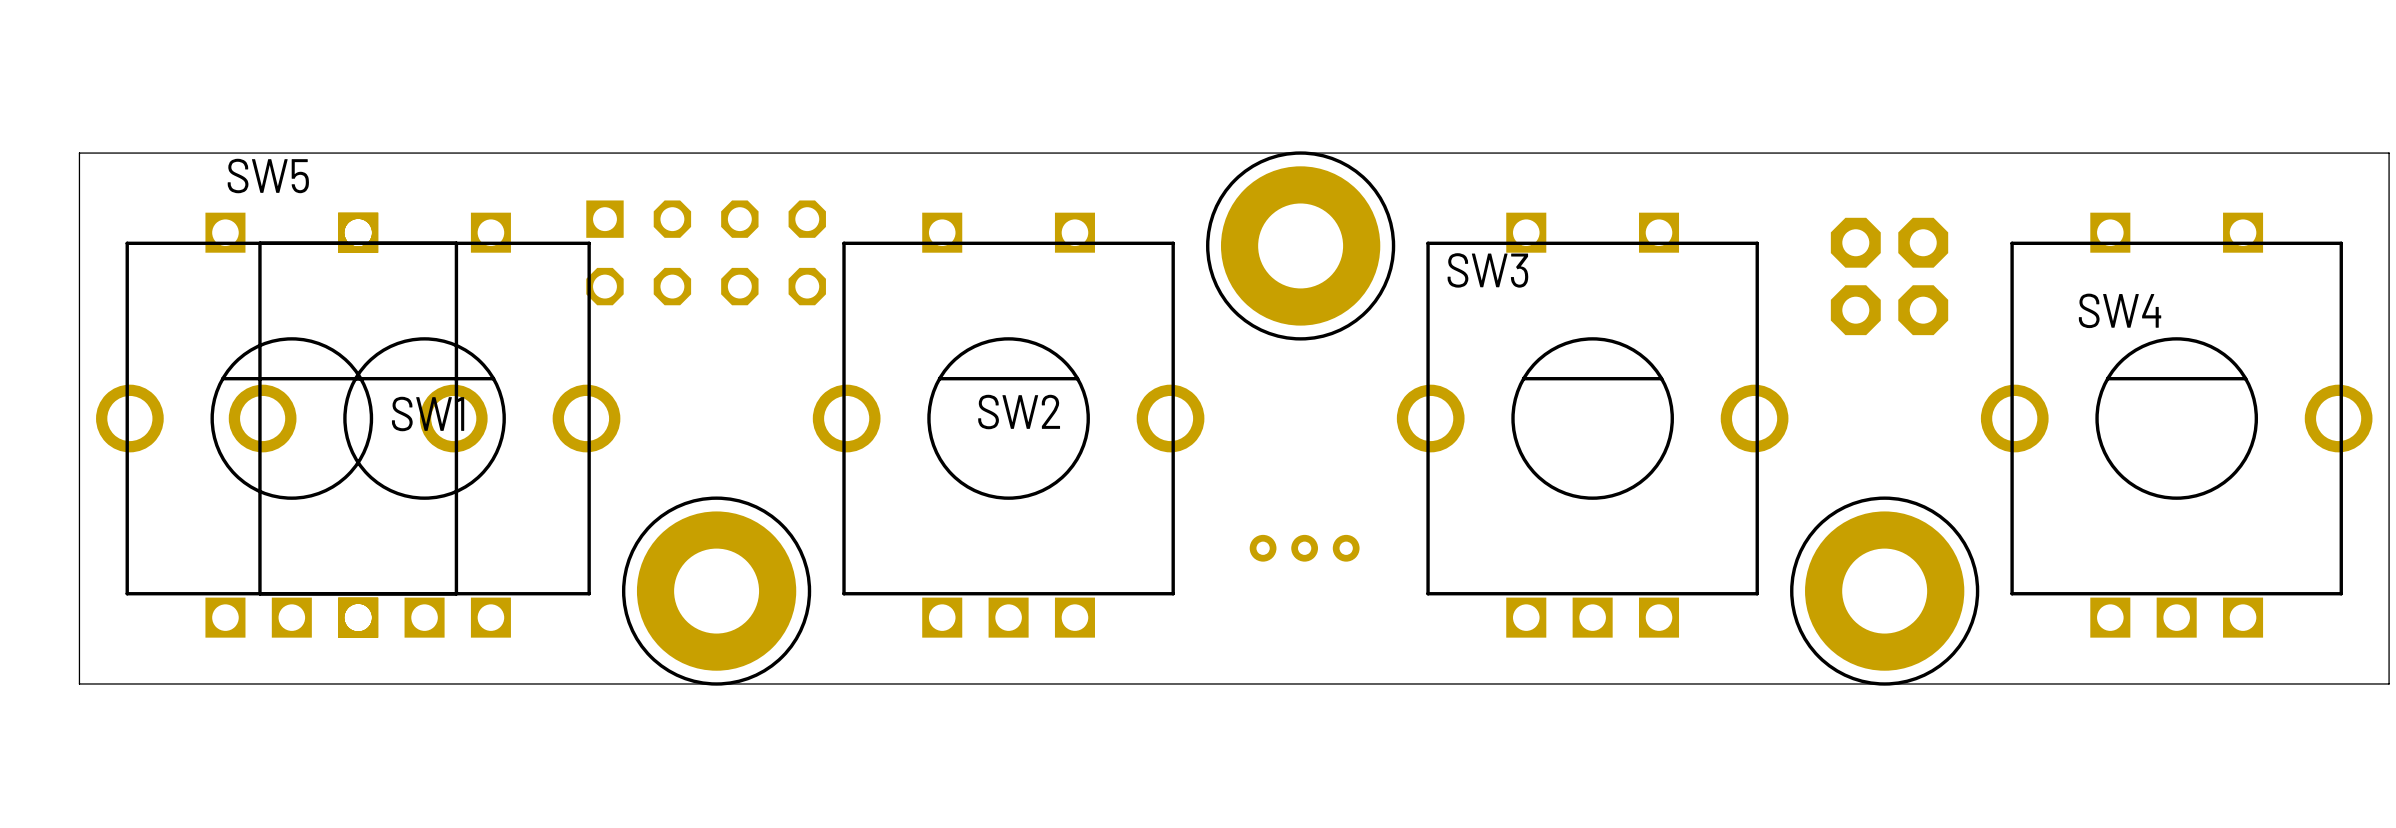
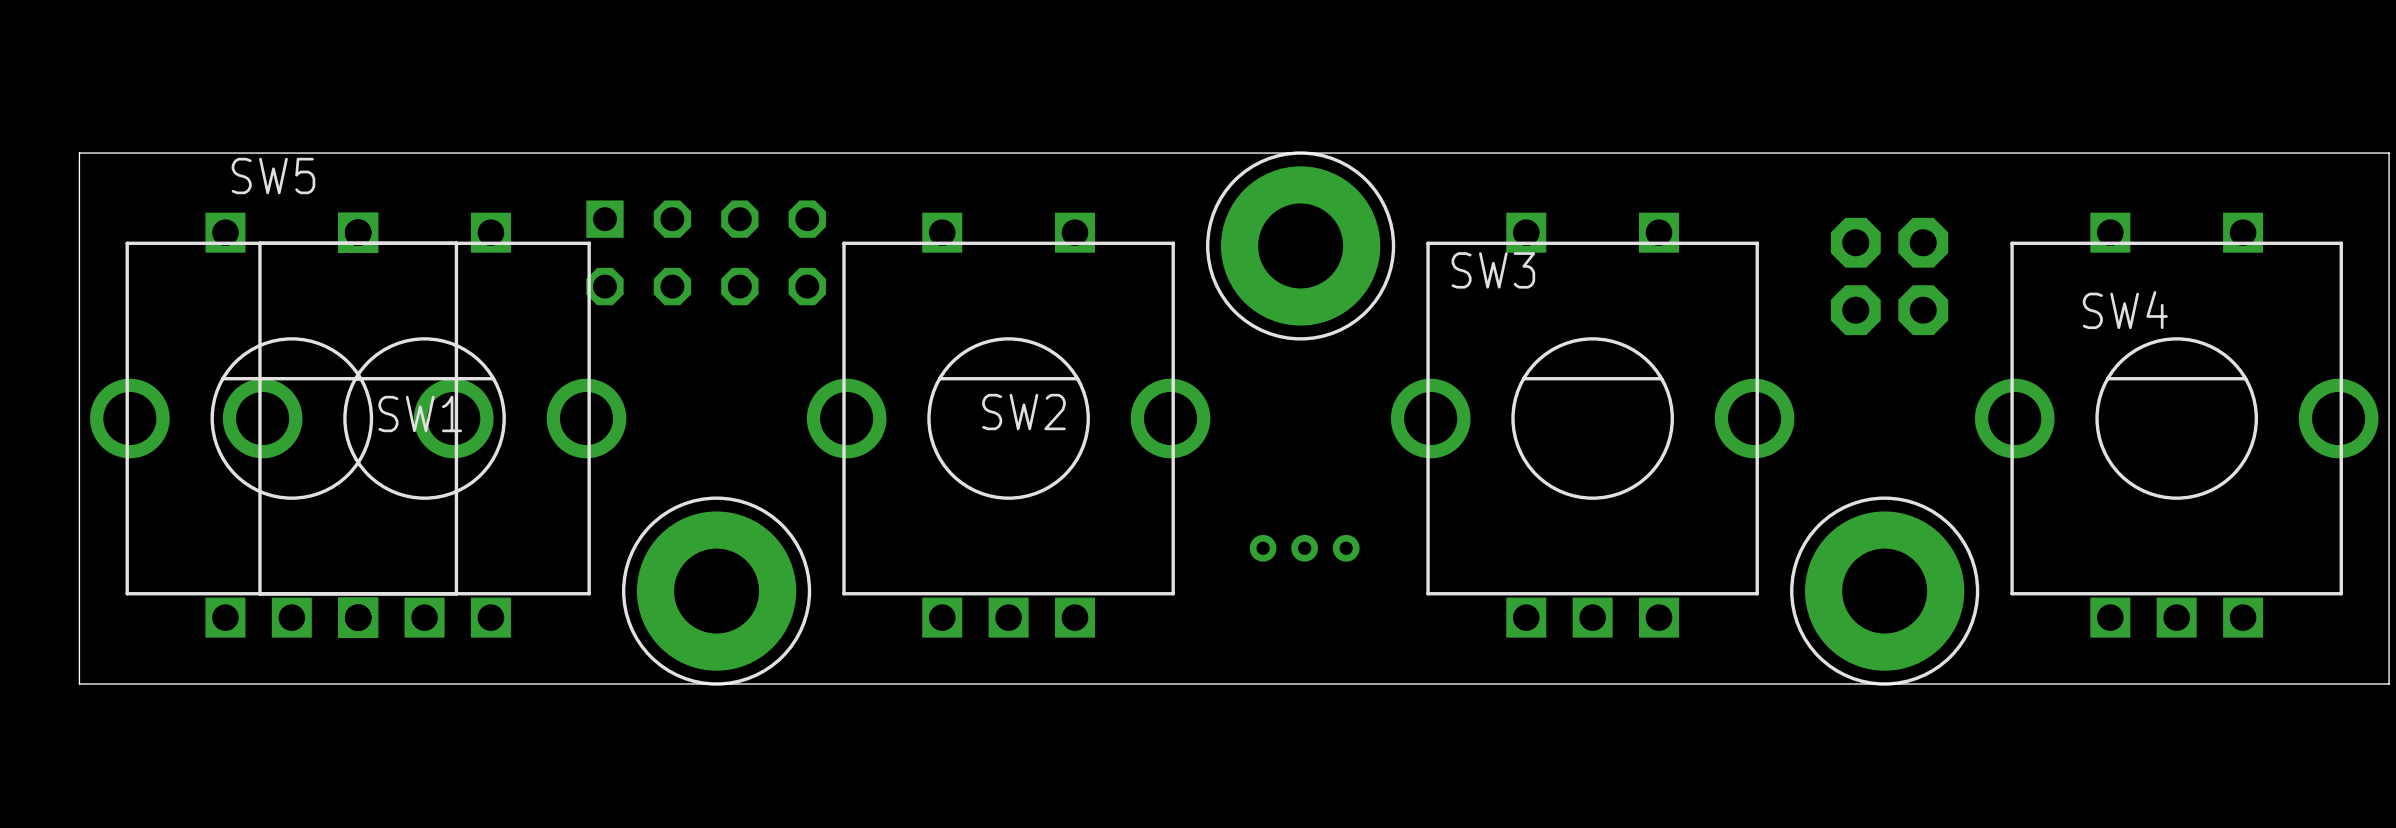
SW5 footprint: [96, 212, 488, 638] -> [90, 212, 494, 638]
SW1 footprint: [228, 212, 621, 638] -> [222, 212, 627, 638]
SW2 footprint: [812, 212, 1205, 638] -> [806, 212, 1211, 638]
SW3 footprint: [1396, 212, 1789, 638] -> [1390, 212, 1795, 638]
SW4 footprint: [1980, 212, 2373, 638] -> [1974, 212, 2379, 638]

